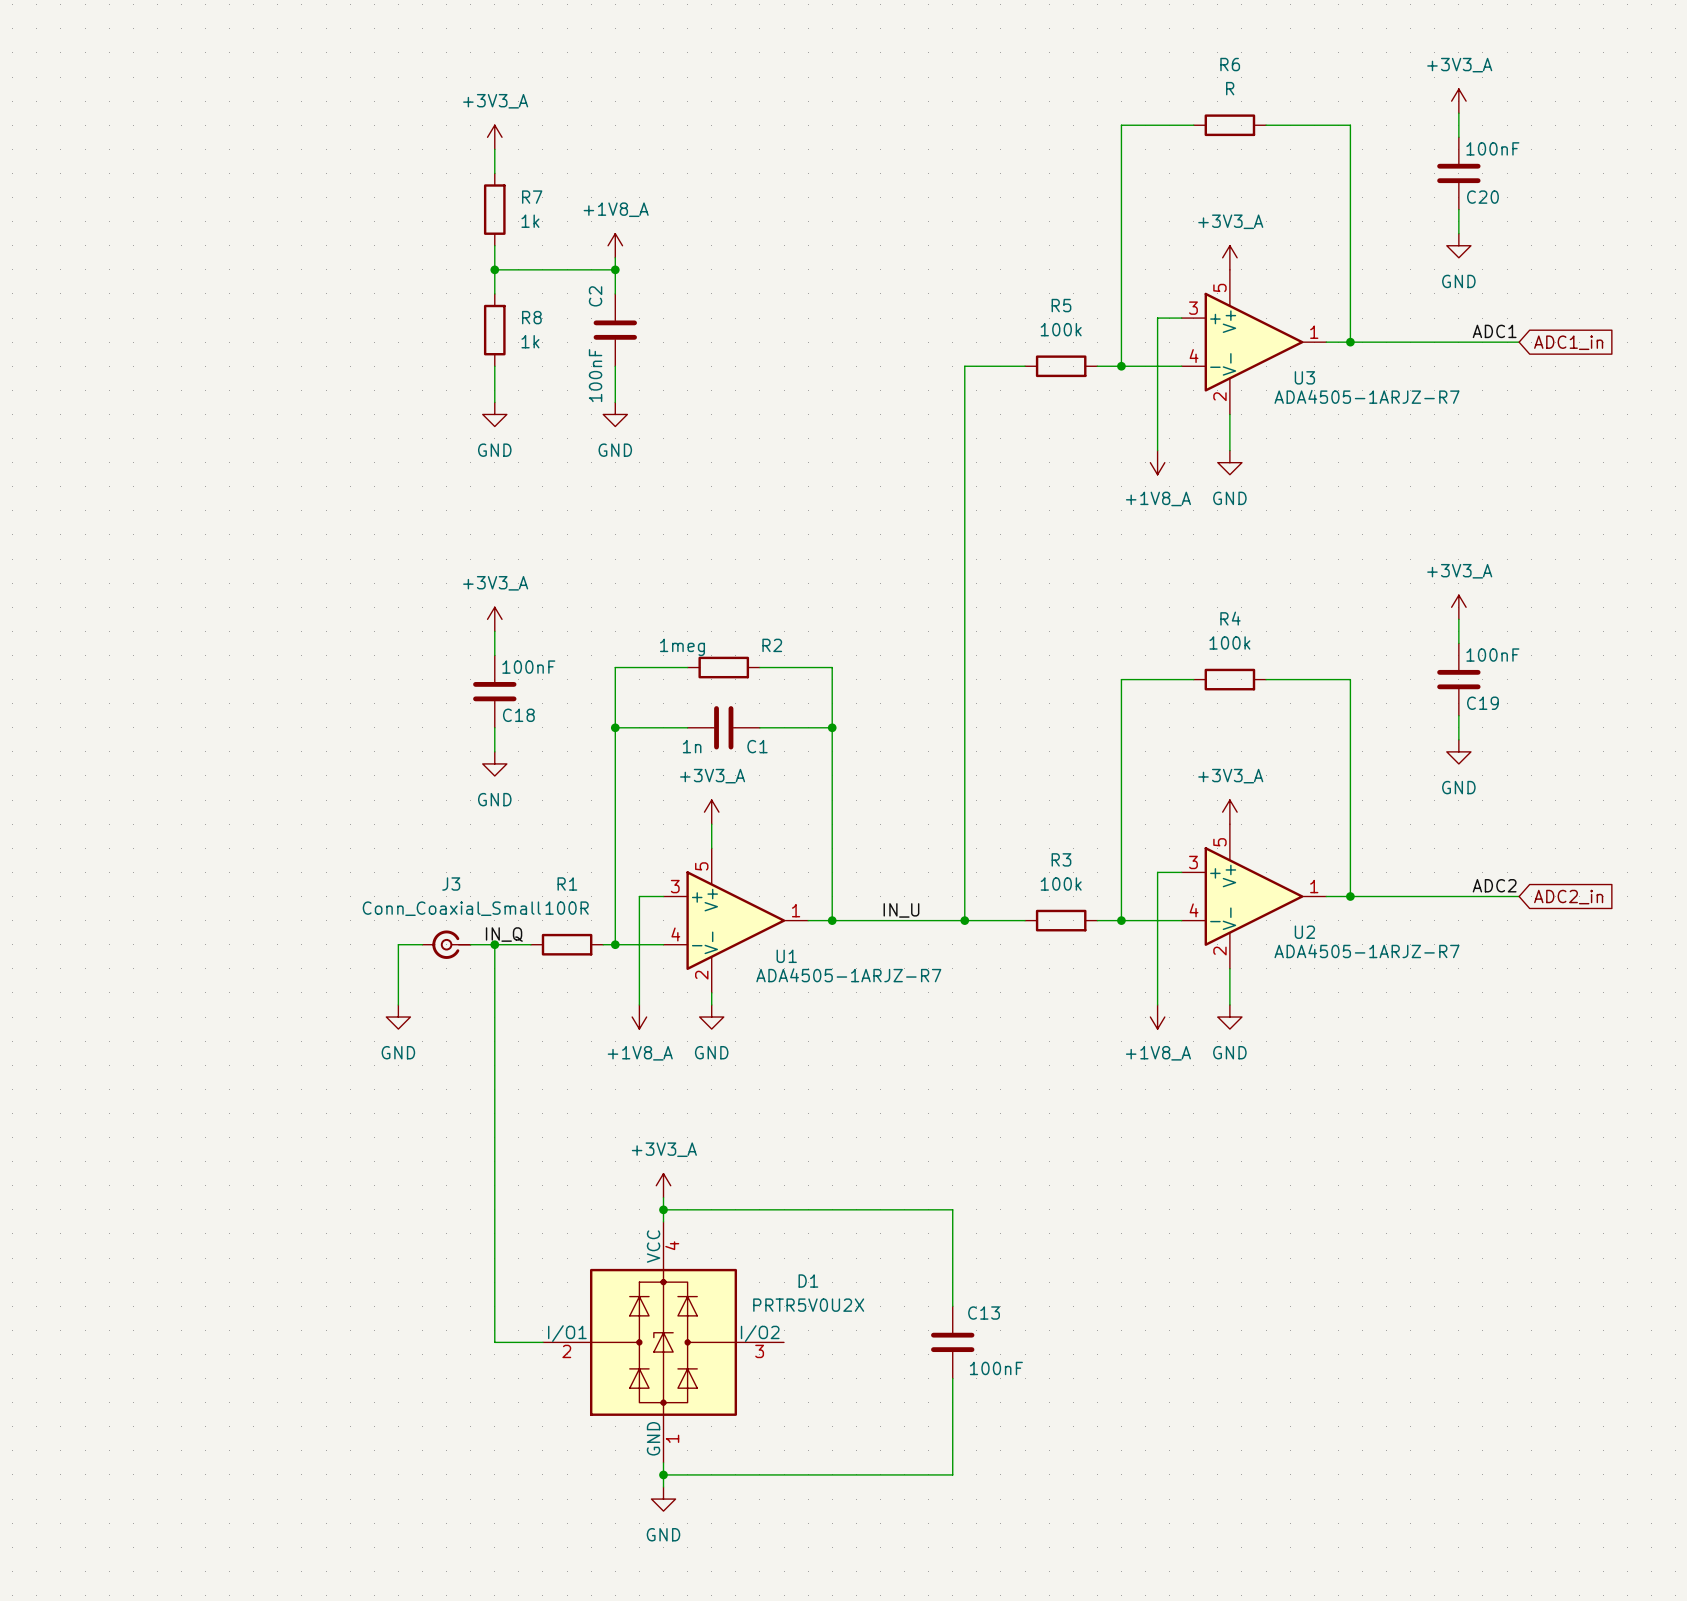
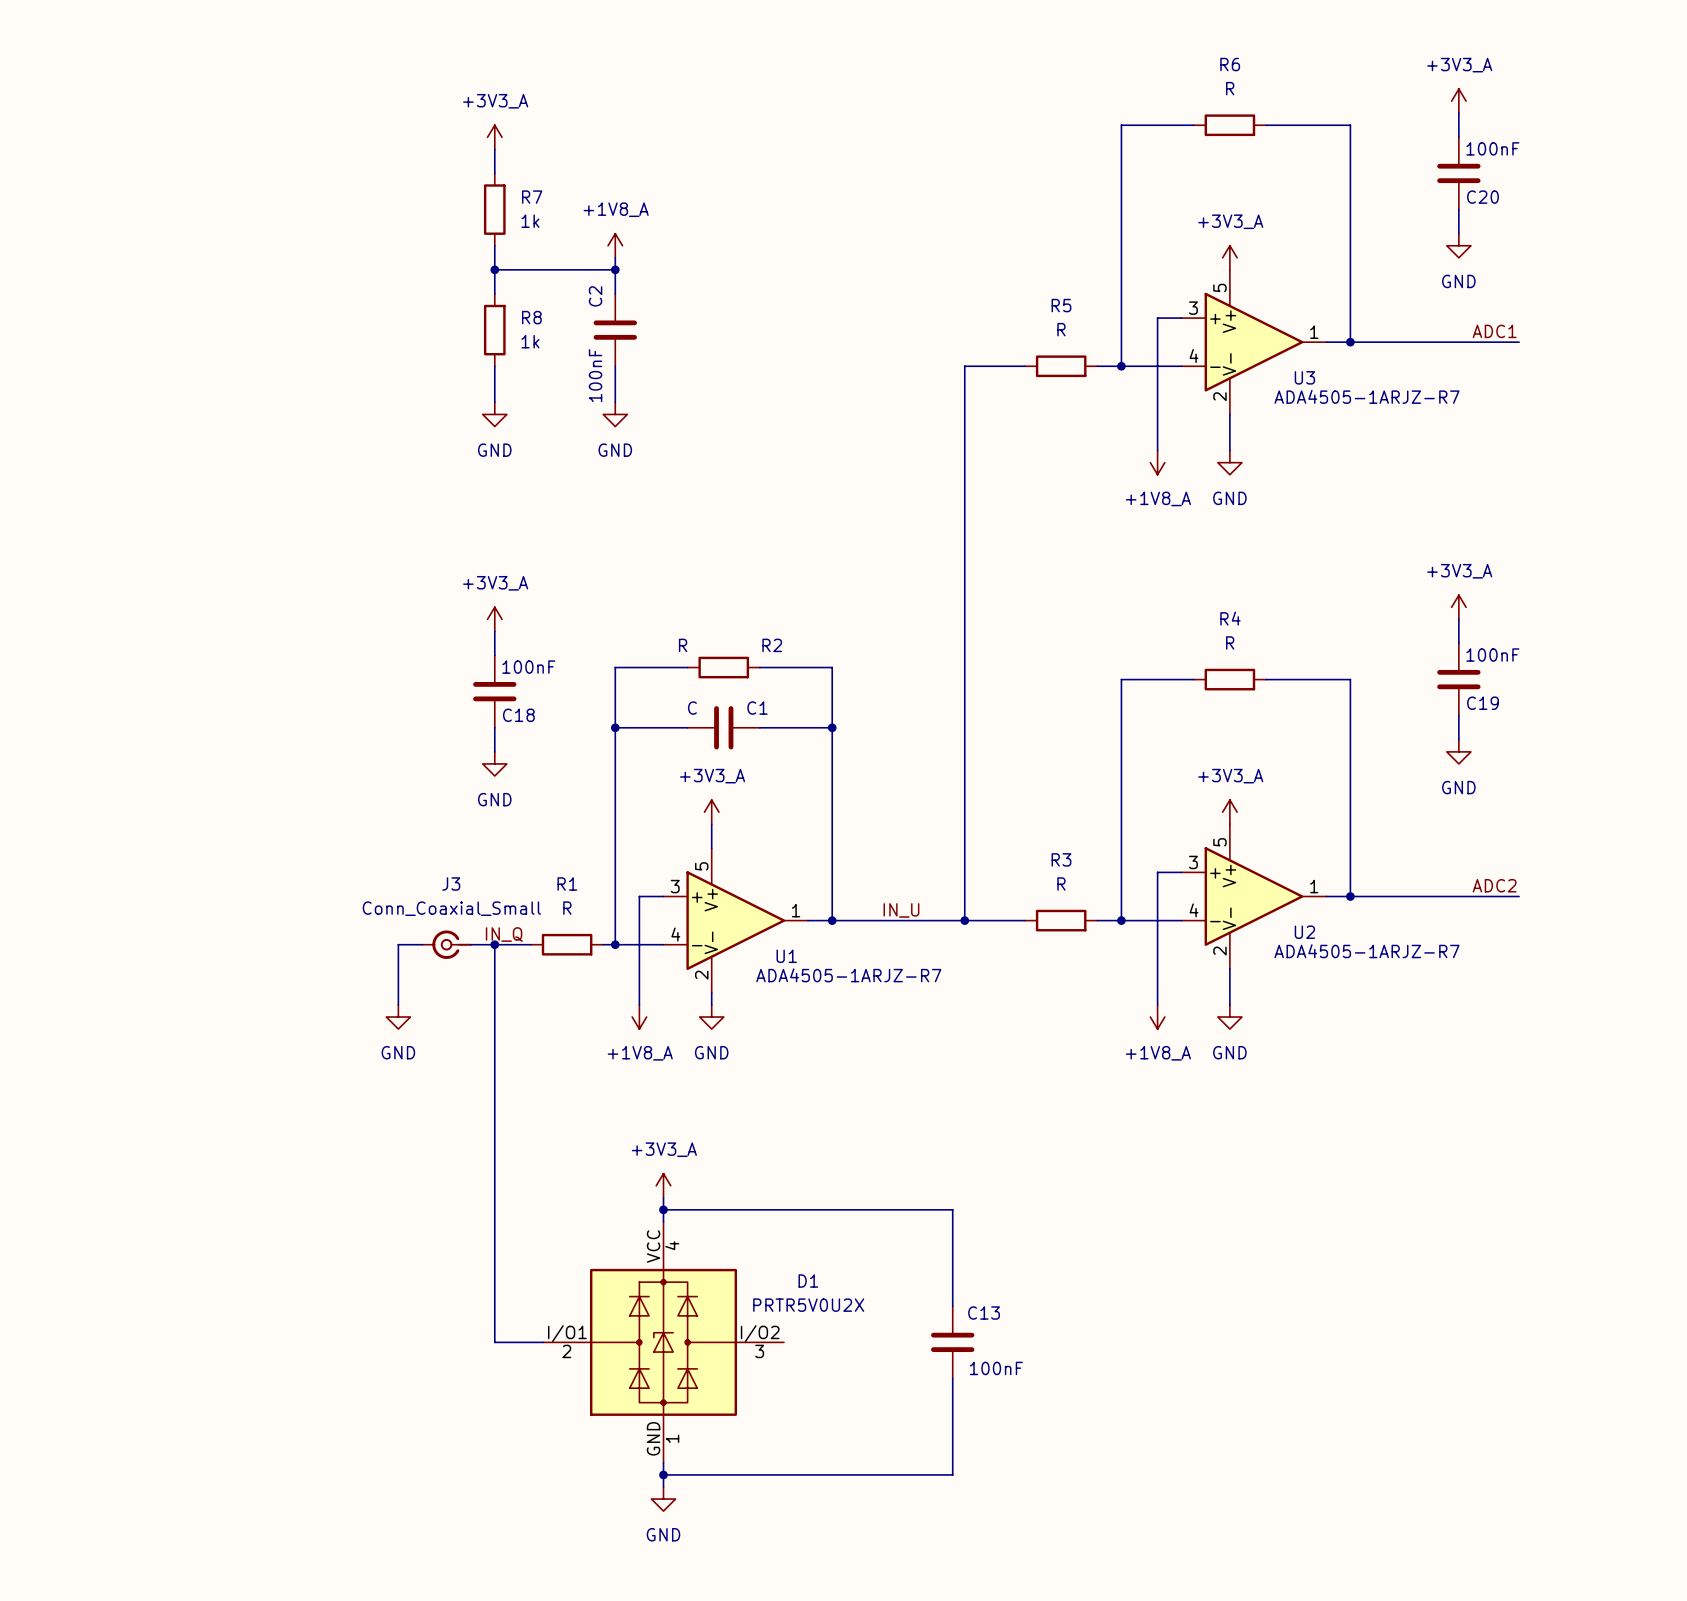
R5 value: 100k (1061, 329) -> R (1061, 329)
global label: ADC1_in (1568, 342) -> none
R4 value: 100k (1229, 642) -> R (1230, 642)
R2 value: 1meg (682, 647) -> R (683, 645)
C1 value: 1n (692, 746) -> C (692, 708)
C1 name position: C1 (757, 746) -> C1 (757, 708)
R3 value: 100k (1061, 884) -> R (1061, 884)
global label: ADC2_in (1568, 897) -> none
R1 value: 100R (567, 908) -> R (567, 908)

